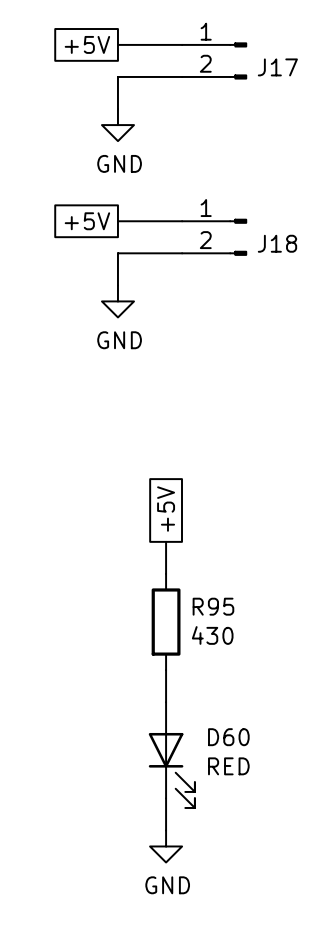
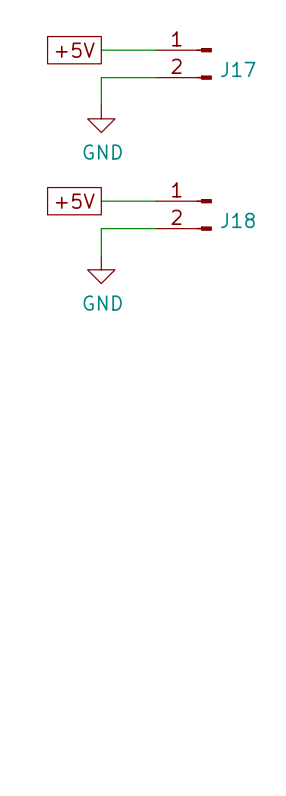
global label: +5V (166, 509) -> none
wire: (166, 541) (166, 573) -> none
R95: 430 (166, 622) -> none
wire: (166, 670) (166, 702) -> none
D60: RED (171, 755) -> none
wire: (166, 798) (166, 830) -> none
power symbol: GND (166, 846) -> none

